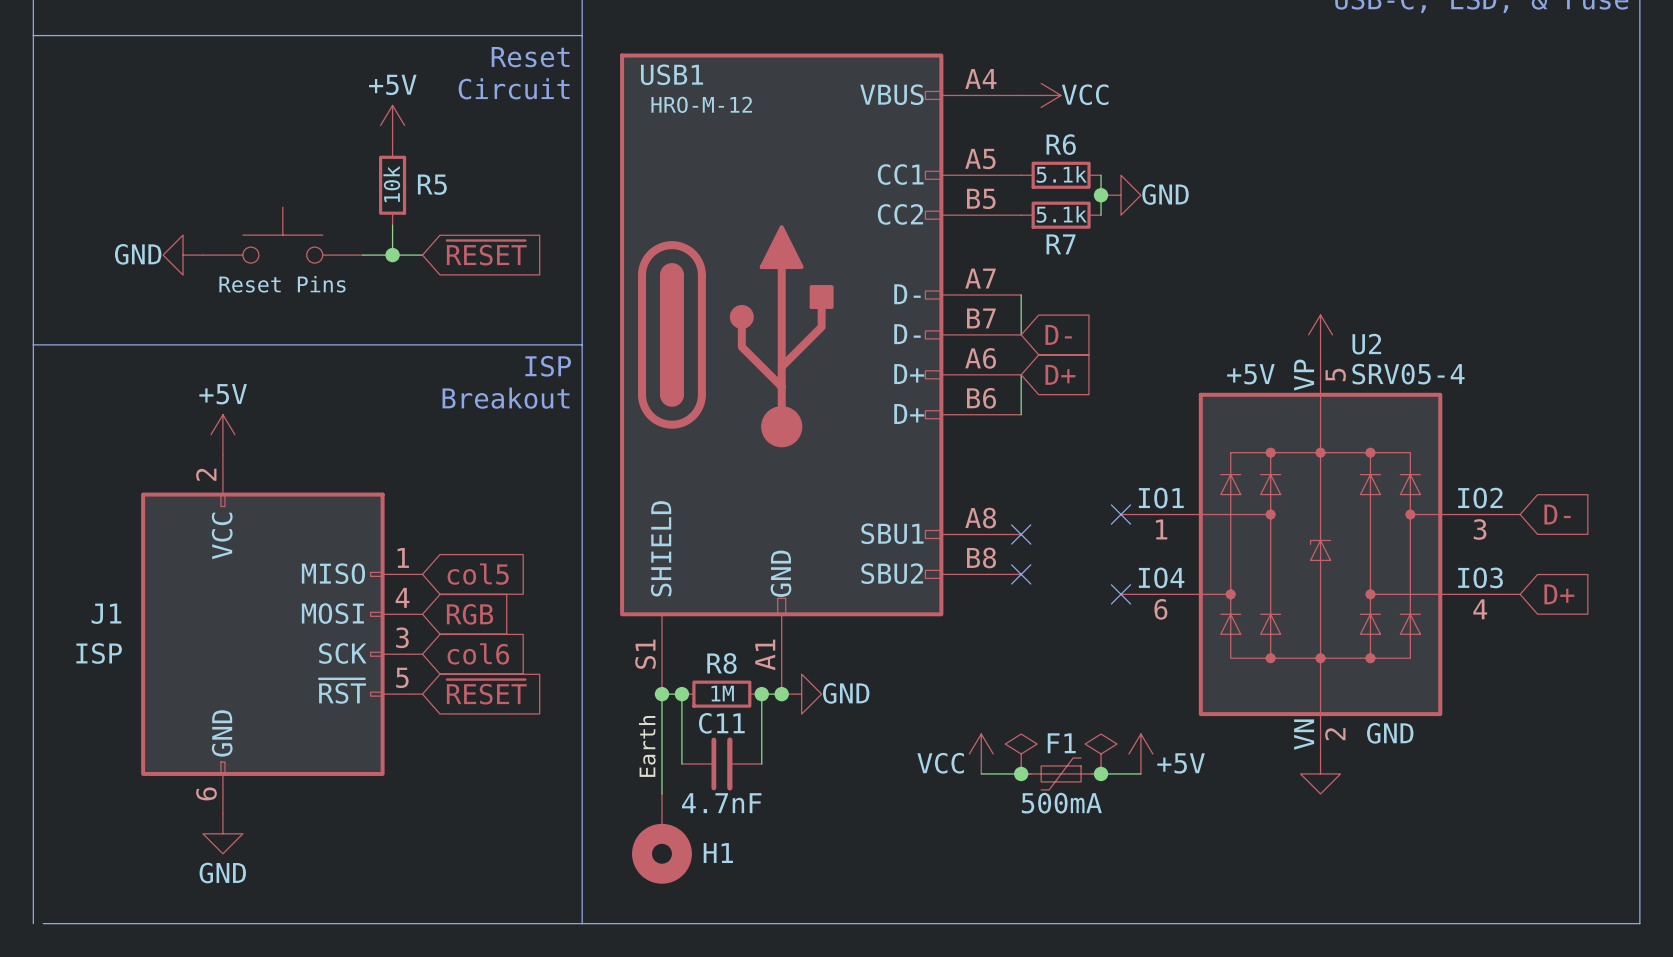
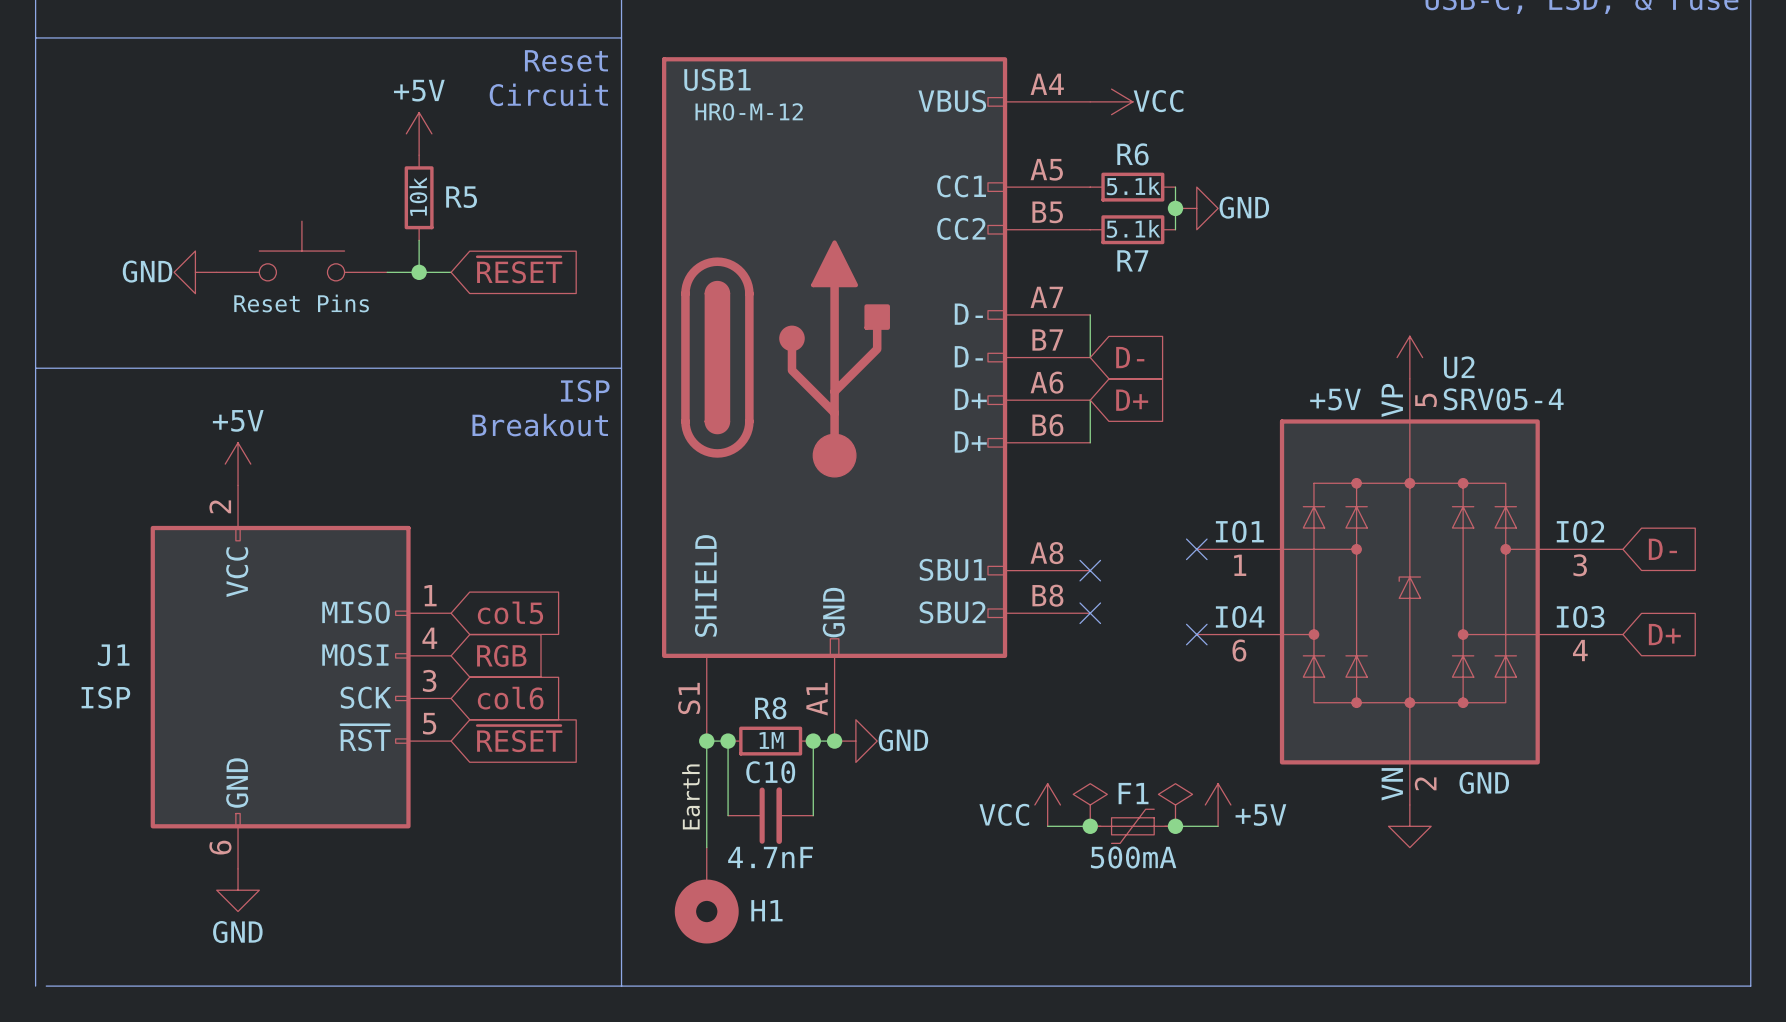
C11 name: C11 (721, 723) -> C10 (770, 772)

